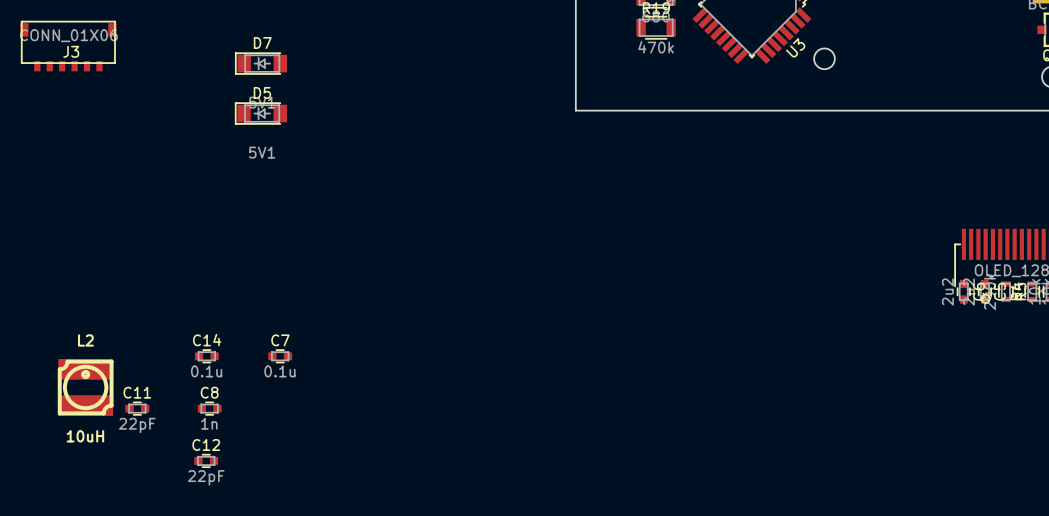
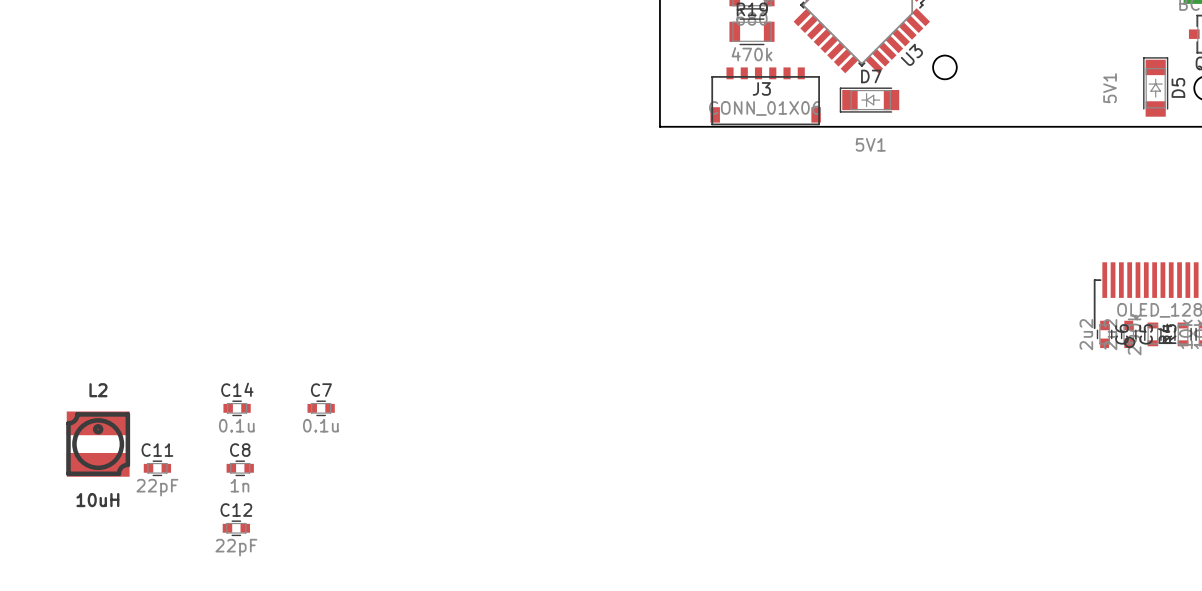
J3 rotation: 0° (68, 46) -> 180° (765, 96)
J3 position: (68, 46) -> (765, 96)
D7 position: (261, 63) -> (869, 100)
D5 rotation: 0° (261, 113) -> 90° clockwise (1155, 86)
D5 position: (261, 113) -> (1155, 86)

